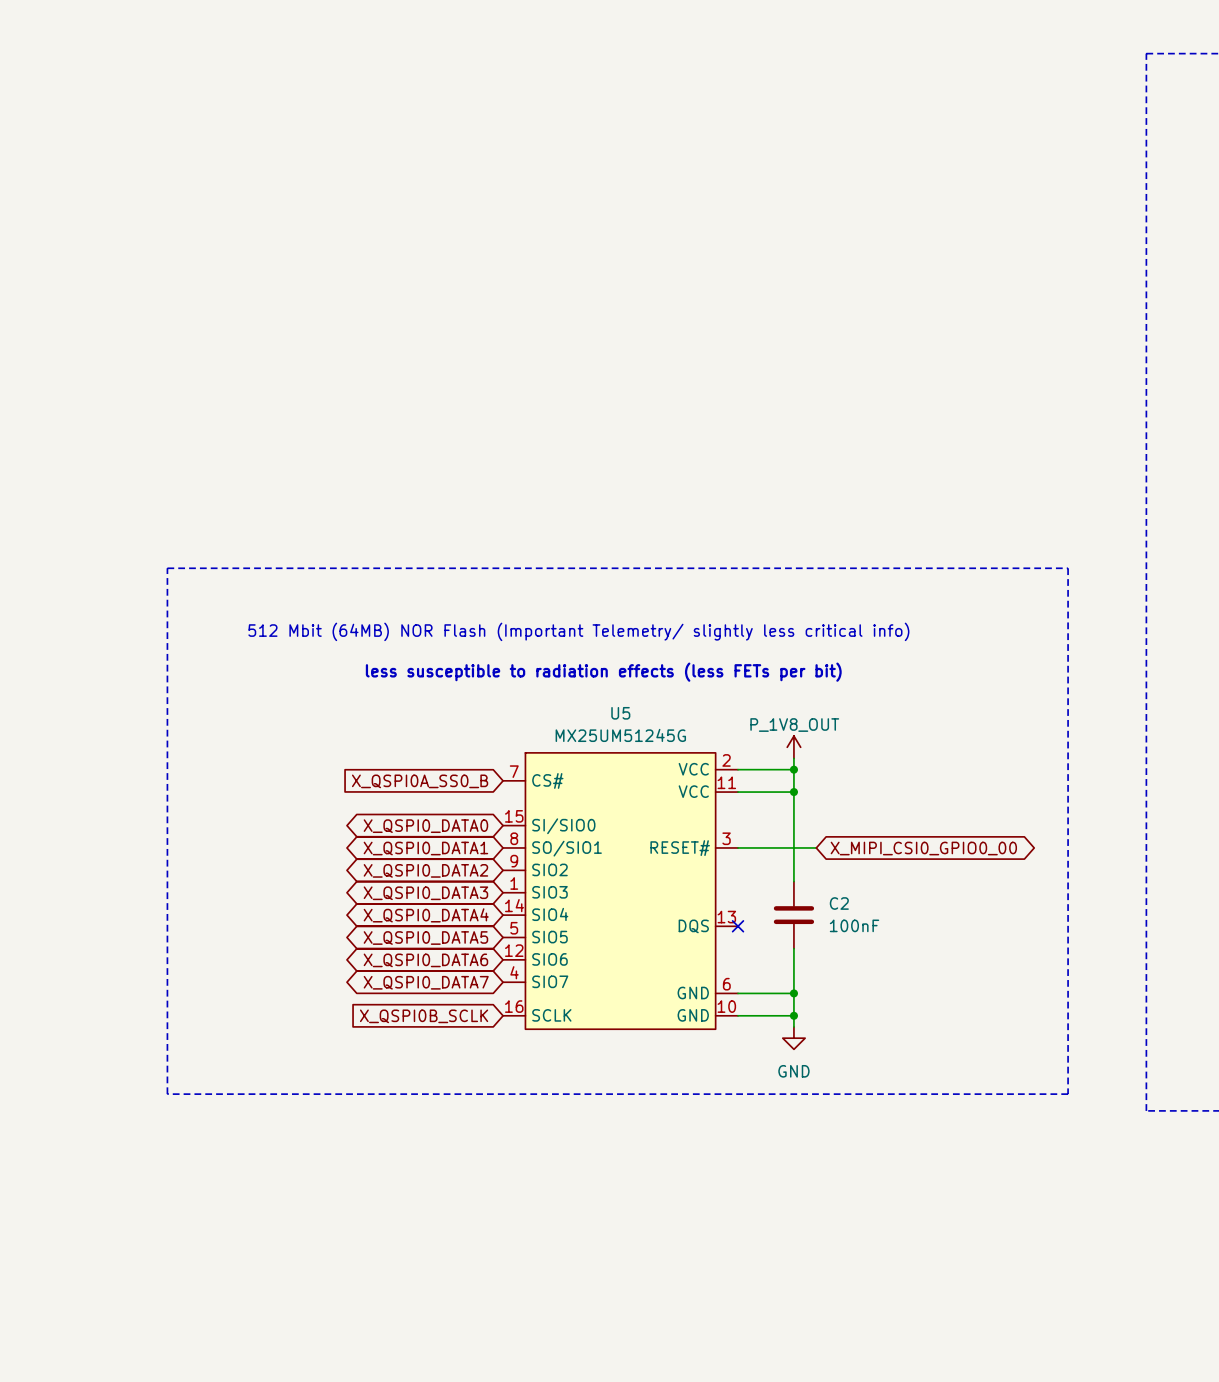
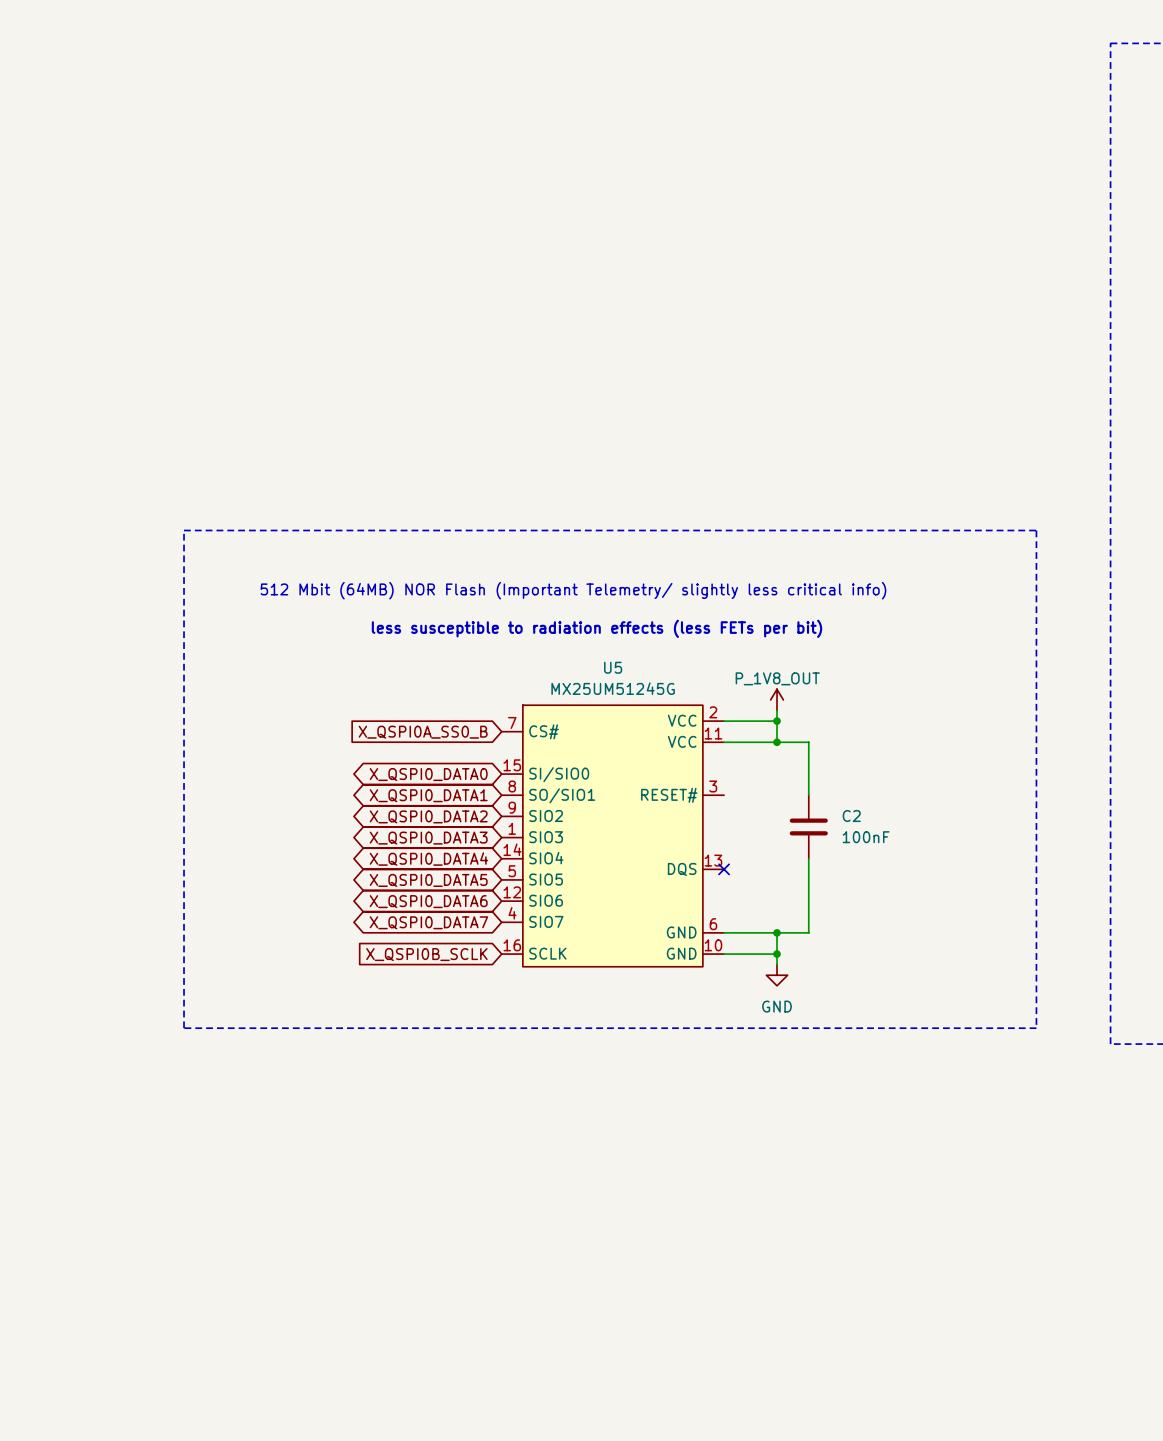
wire: (793, 792) (793, 881) -> (777, 742) (808, 742) (808, 795)
wire: (738, 847) (816, 847) -> none
global label: X_MIPI_CSI0_GPIO0_00 (923, 848) -> none
C2 position: (793, 915) -> (808, 826)
wire: (793, 948) (793, 993) -> (808, 858) (808, 932) (777, 932)

